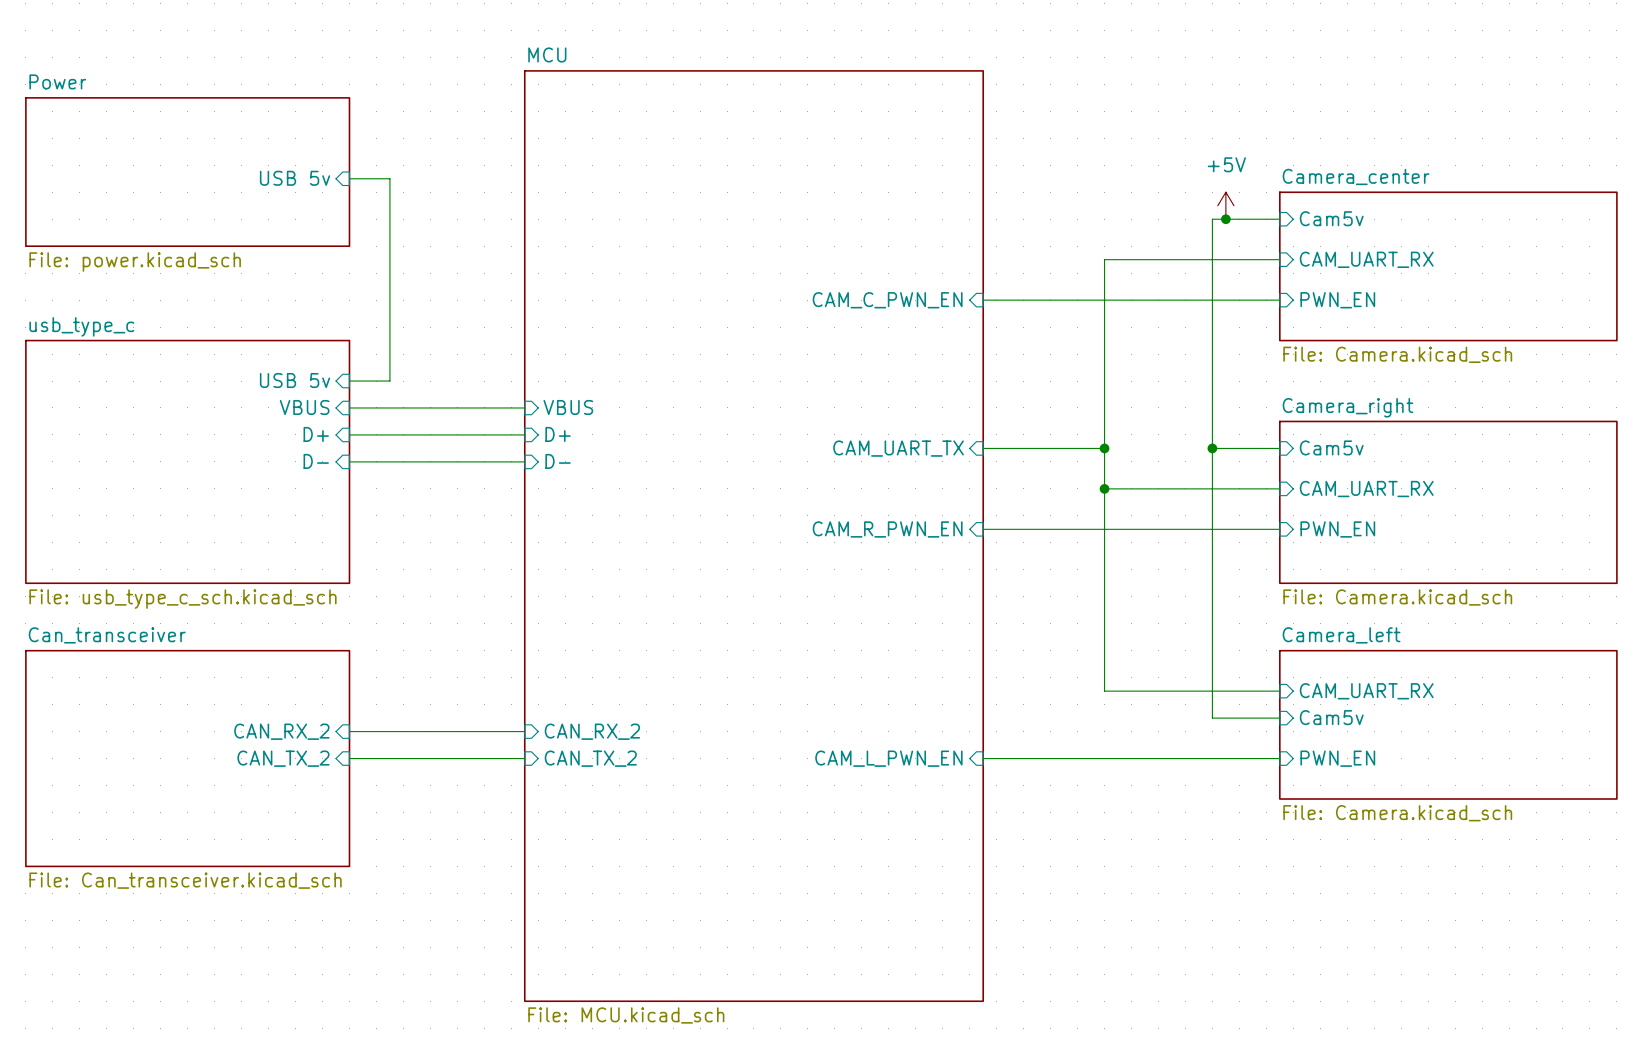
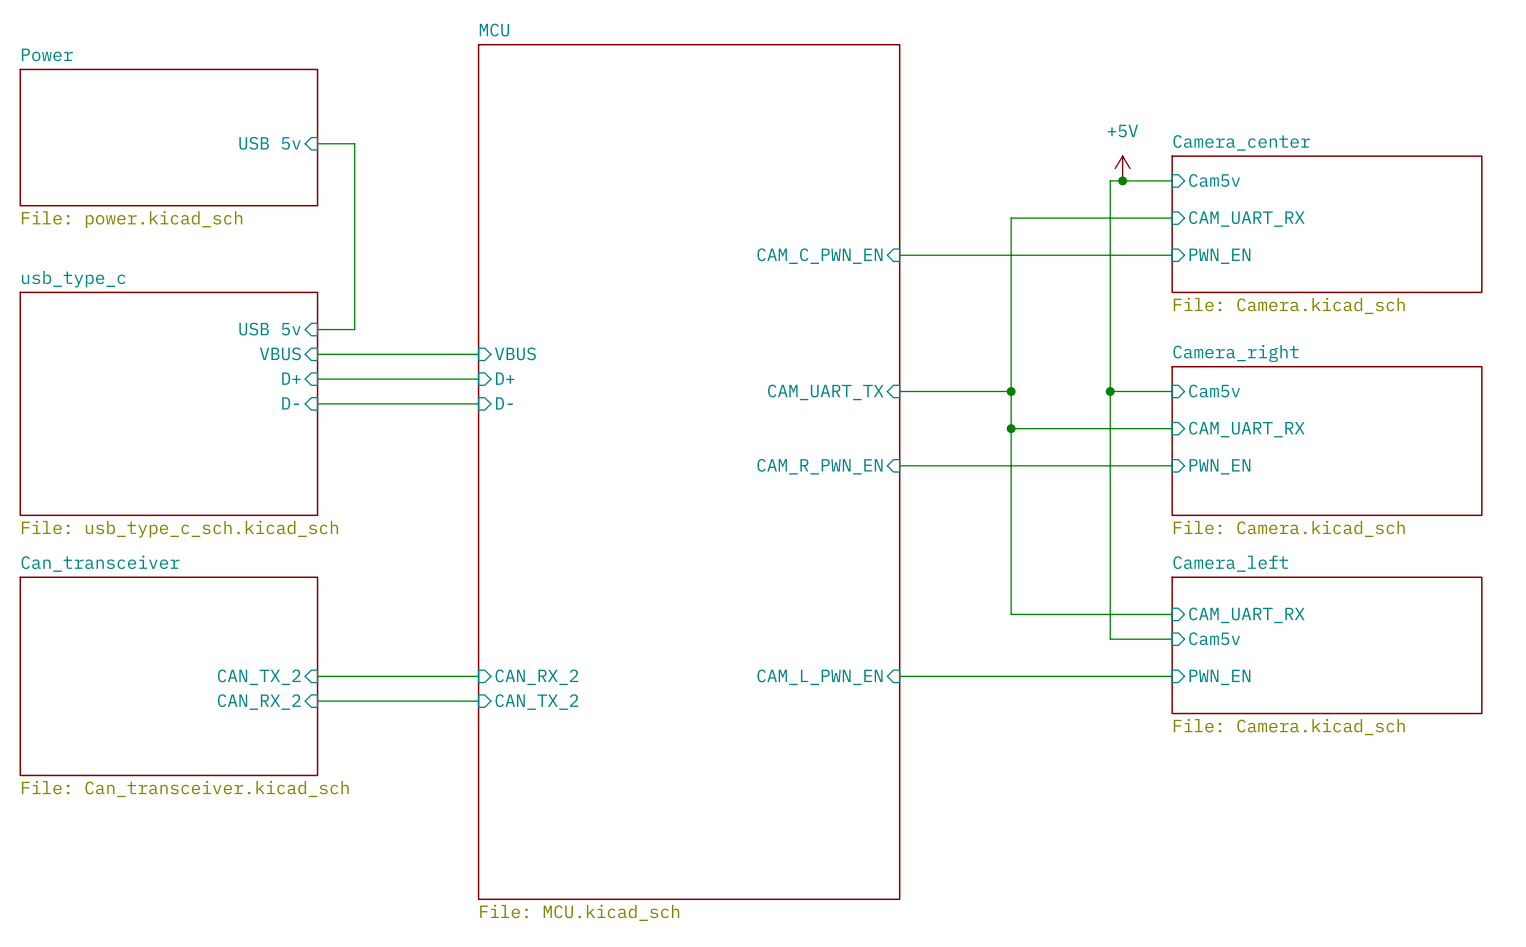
sheet pin position: CAN_RX_2 (281, 731) -> CAN_RX_2 (259, 702)
wire: (349, 731) (524, 731) -> (317, 701) (478, 701)
sheet pin: CAN_RX_2 (592, 731) -> none
sheet pin: CAN_TX_2 (590, 758) -> CAN_RX_2 (536, 677)
sheet pin: none -> CAN_TX_2 (536, 702)

